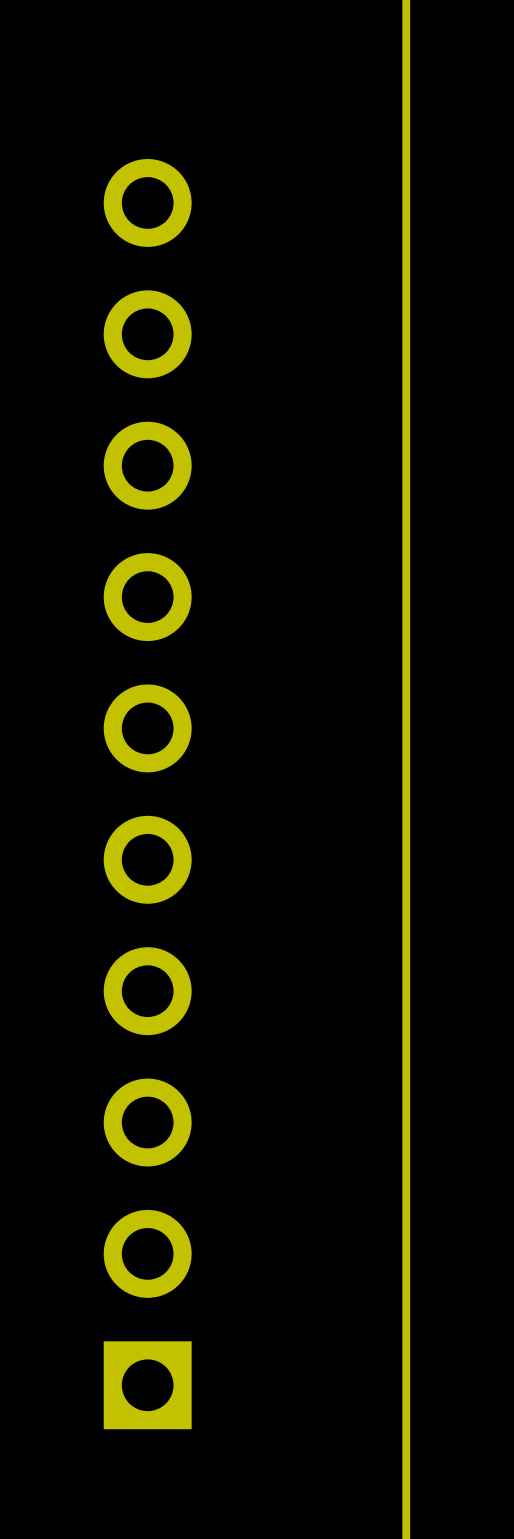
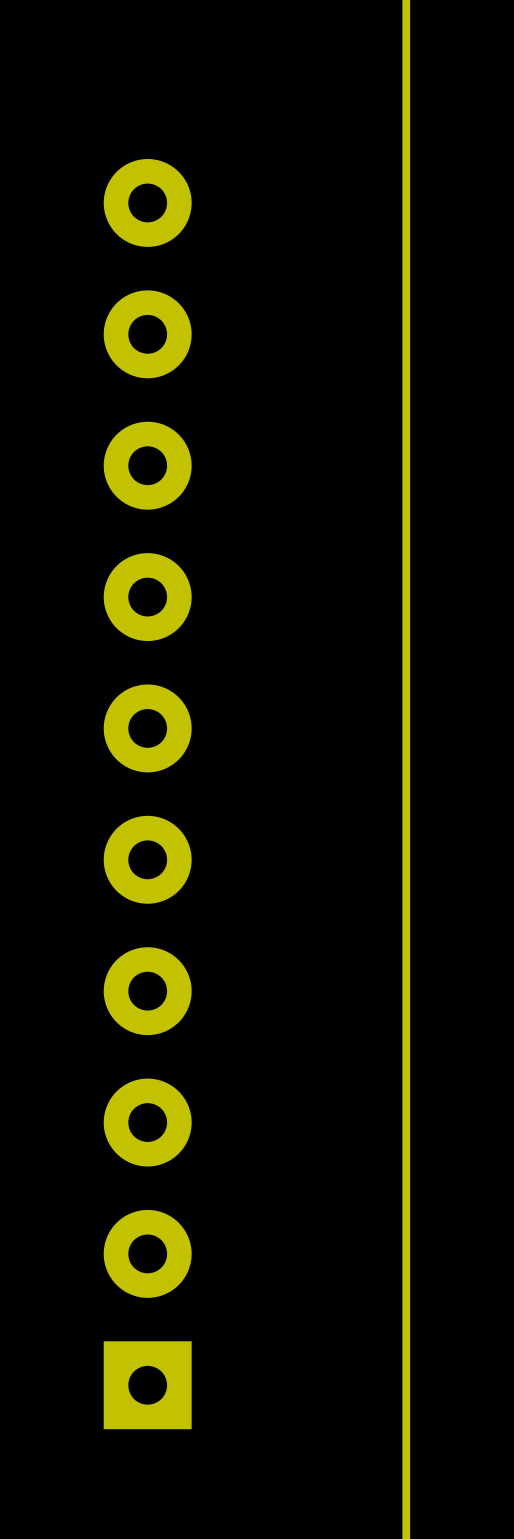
part footprint: [103, 159, 192, 1430] -> [103, 159, 192, 1430]

